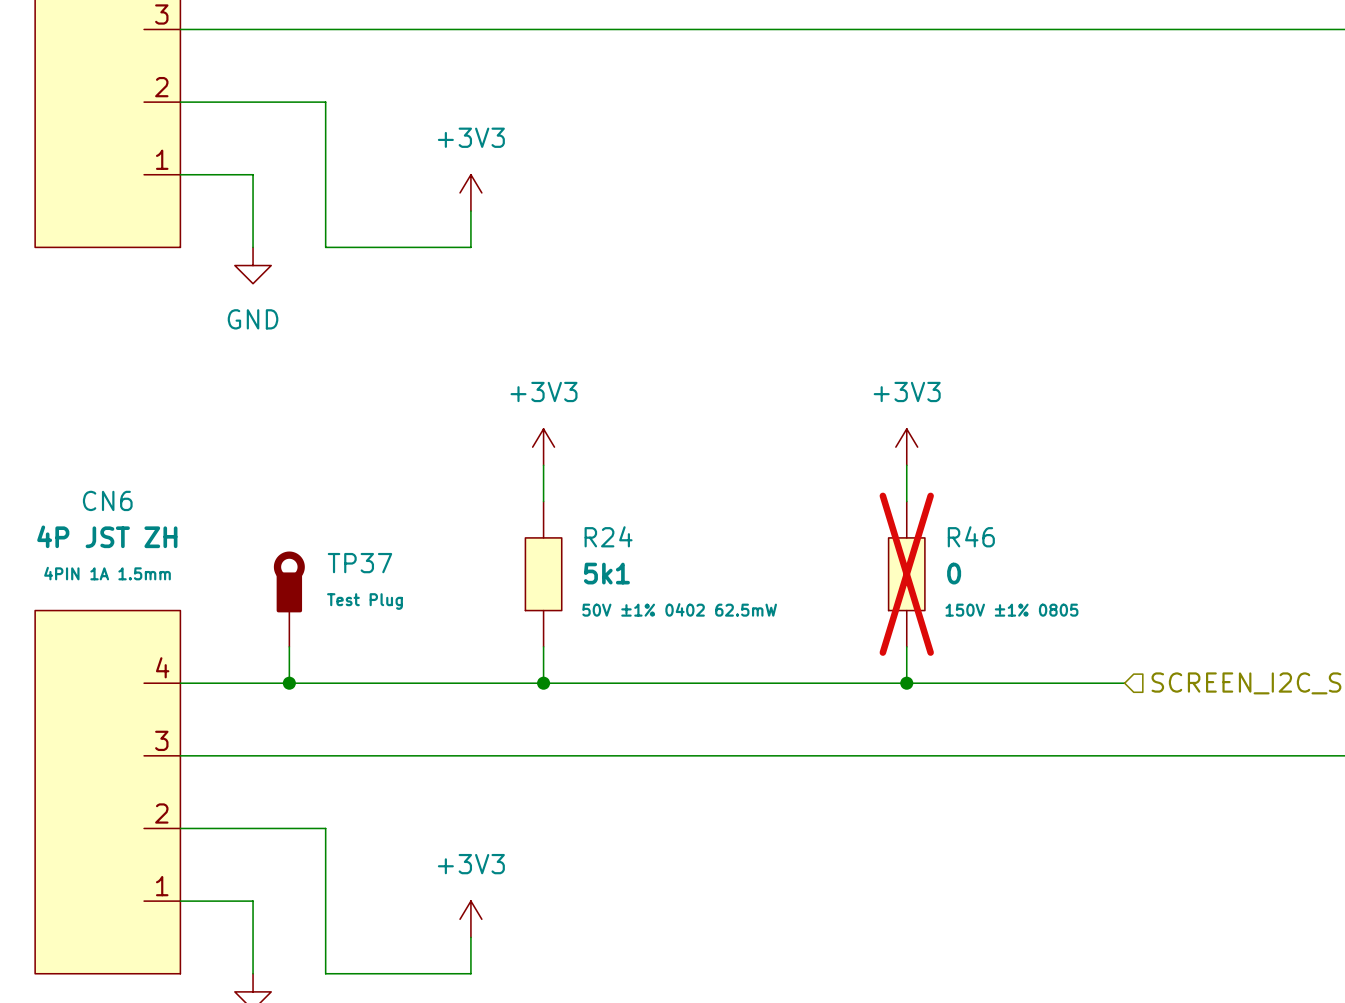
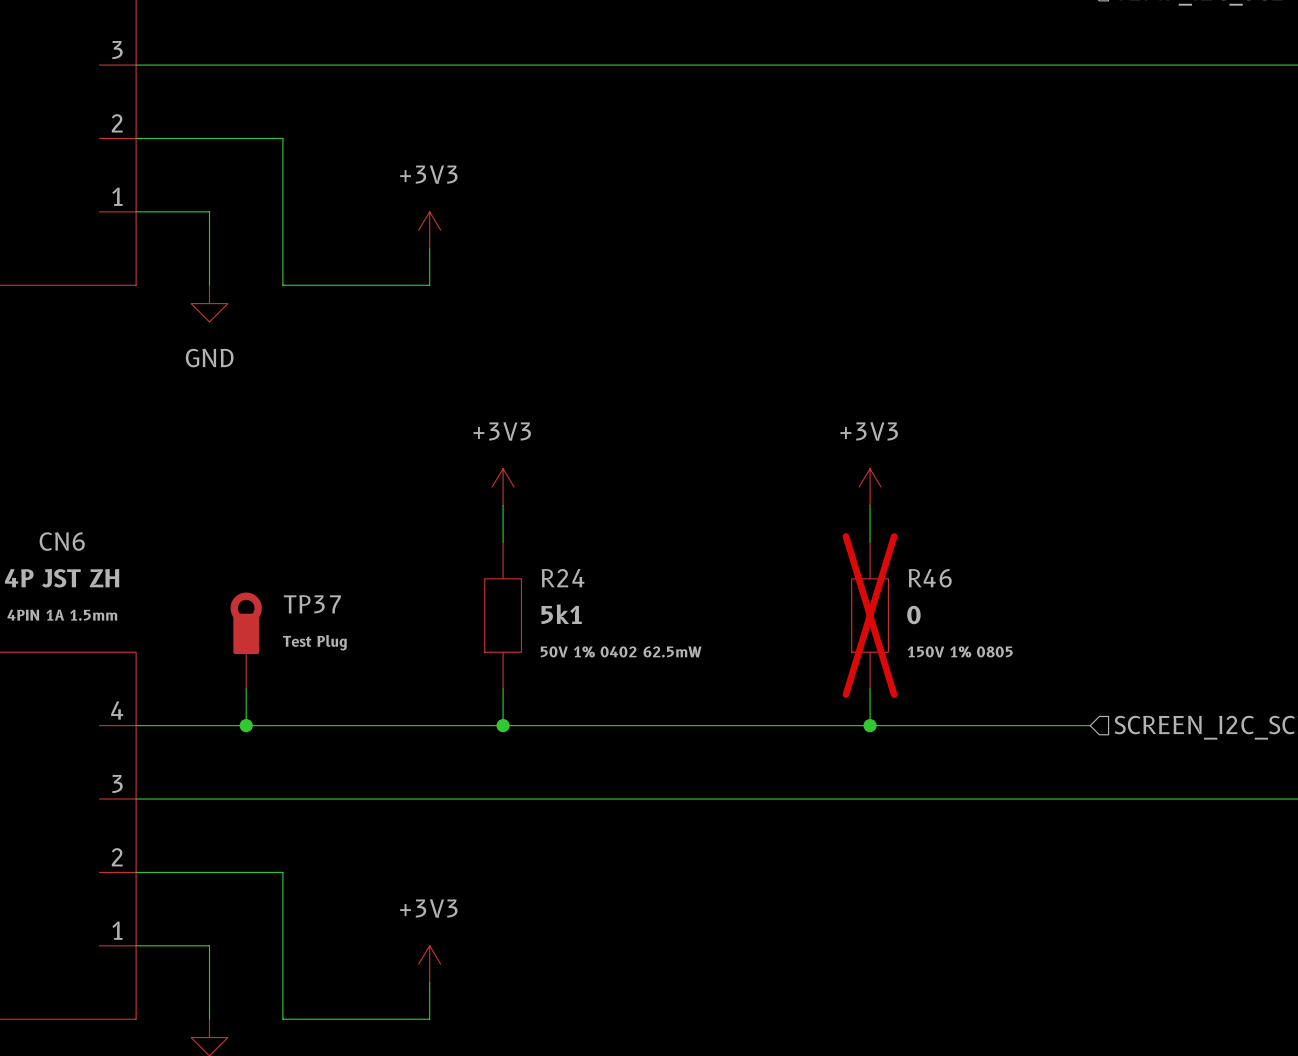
R24 text: 50V ±1% 0402 62.5mW (679, 609) -> 50V 1% 0402 62.5mW (621, 651)
R46 text: 150V ±1% 0805 (1011, 610) -> 150V 1% 0805 (960, 651)

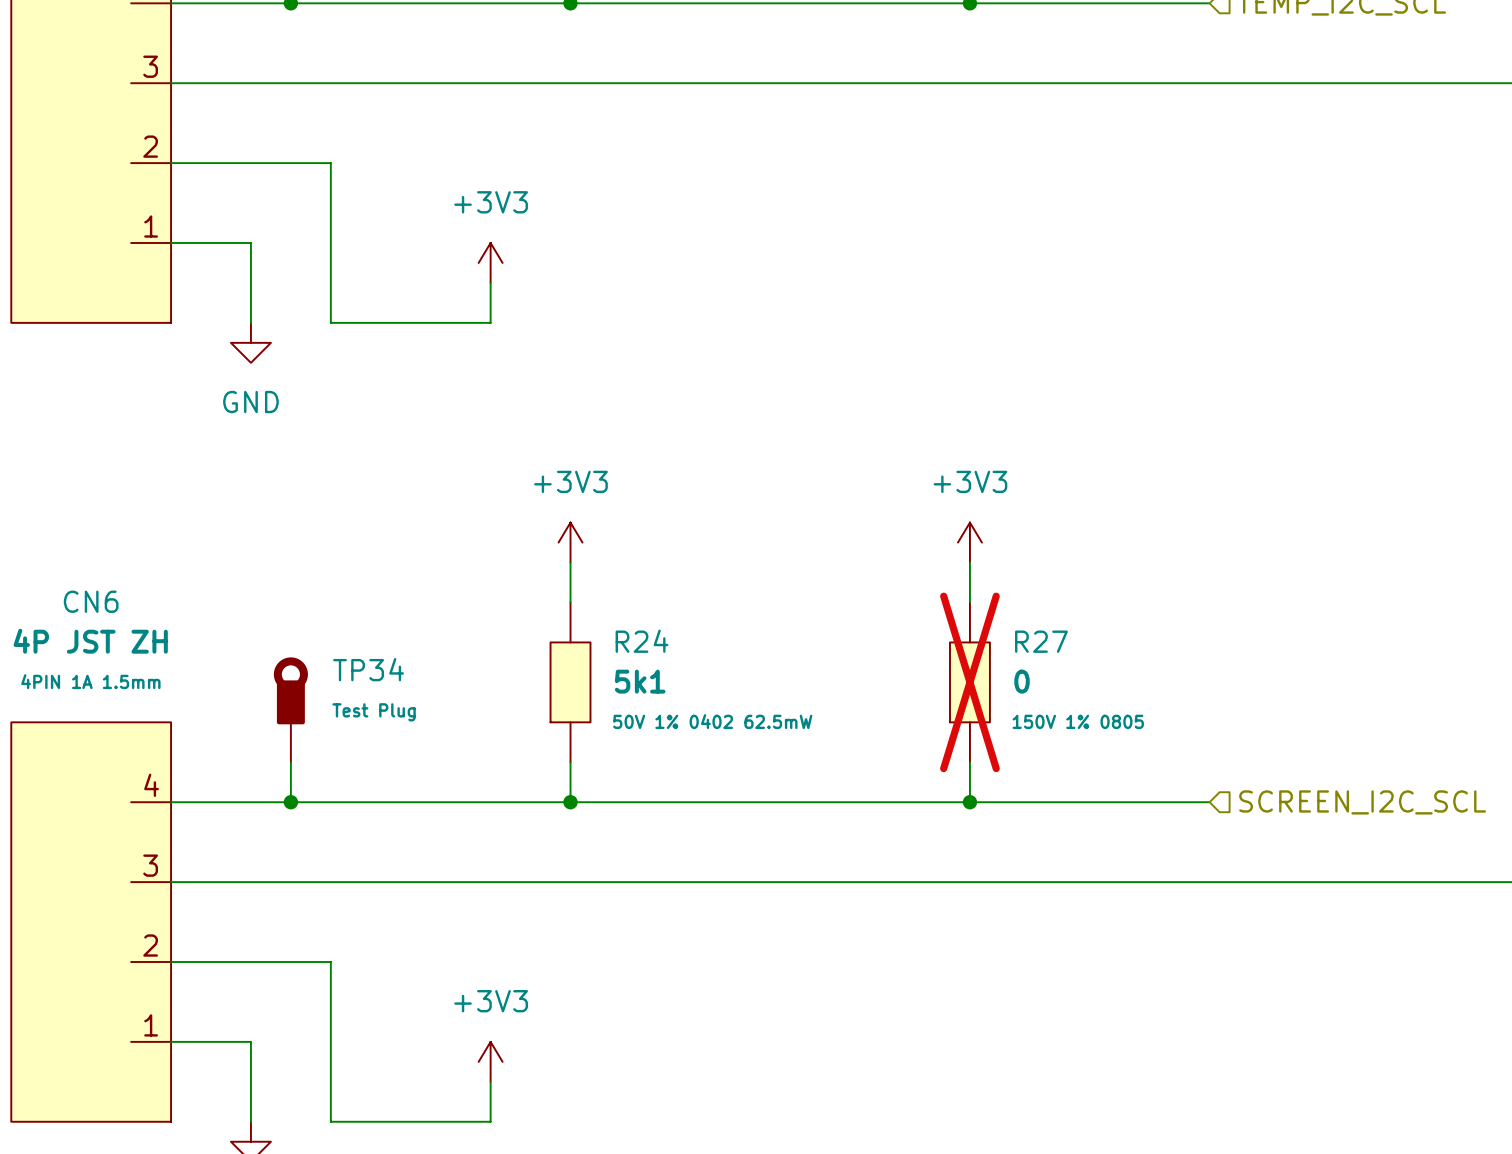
R46 name: R46 (930, 578) -> R27 (1041, 641)
TP37 name: TP37 (312, 604) -> TP34 (368, 669)

